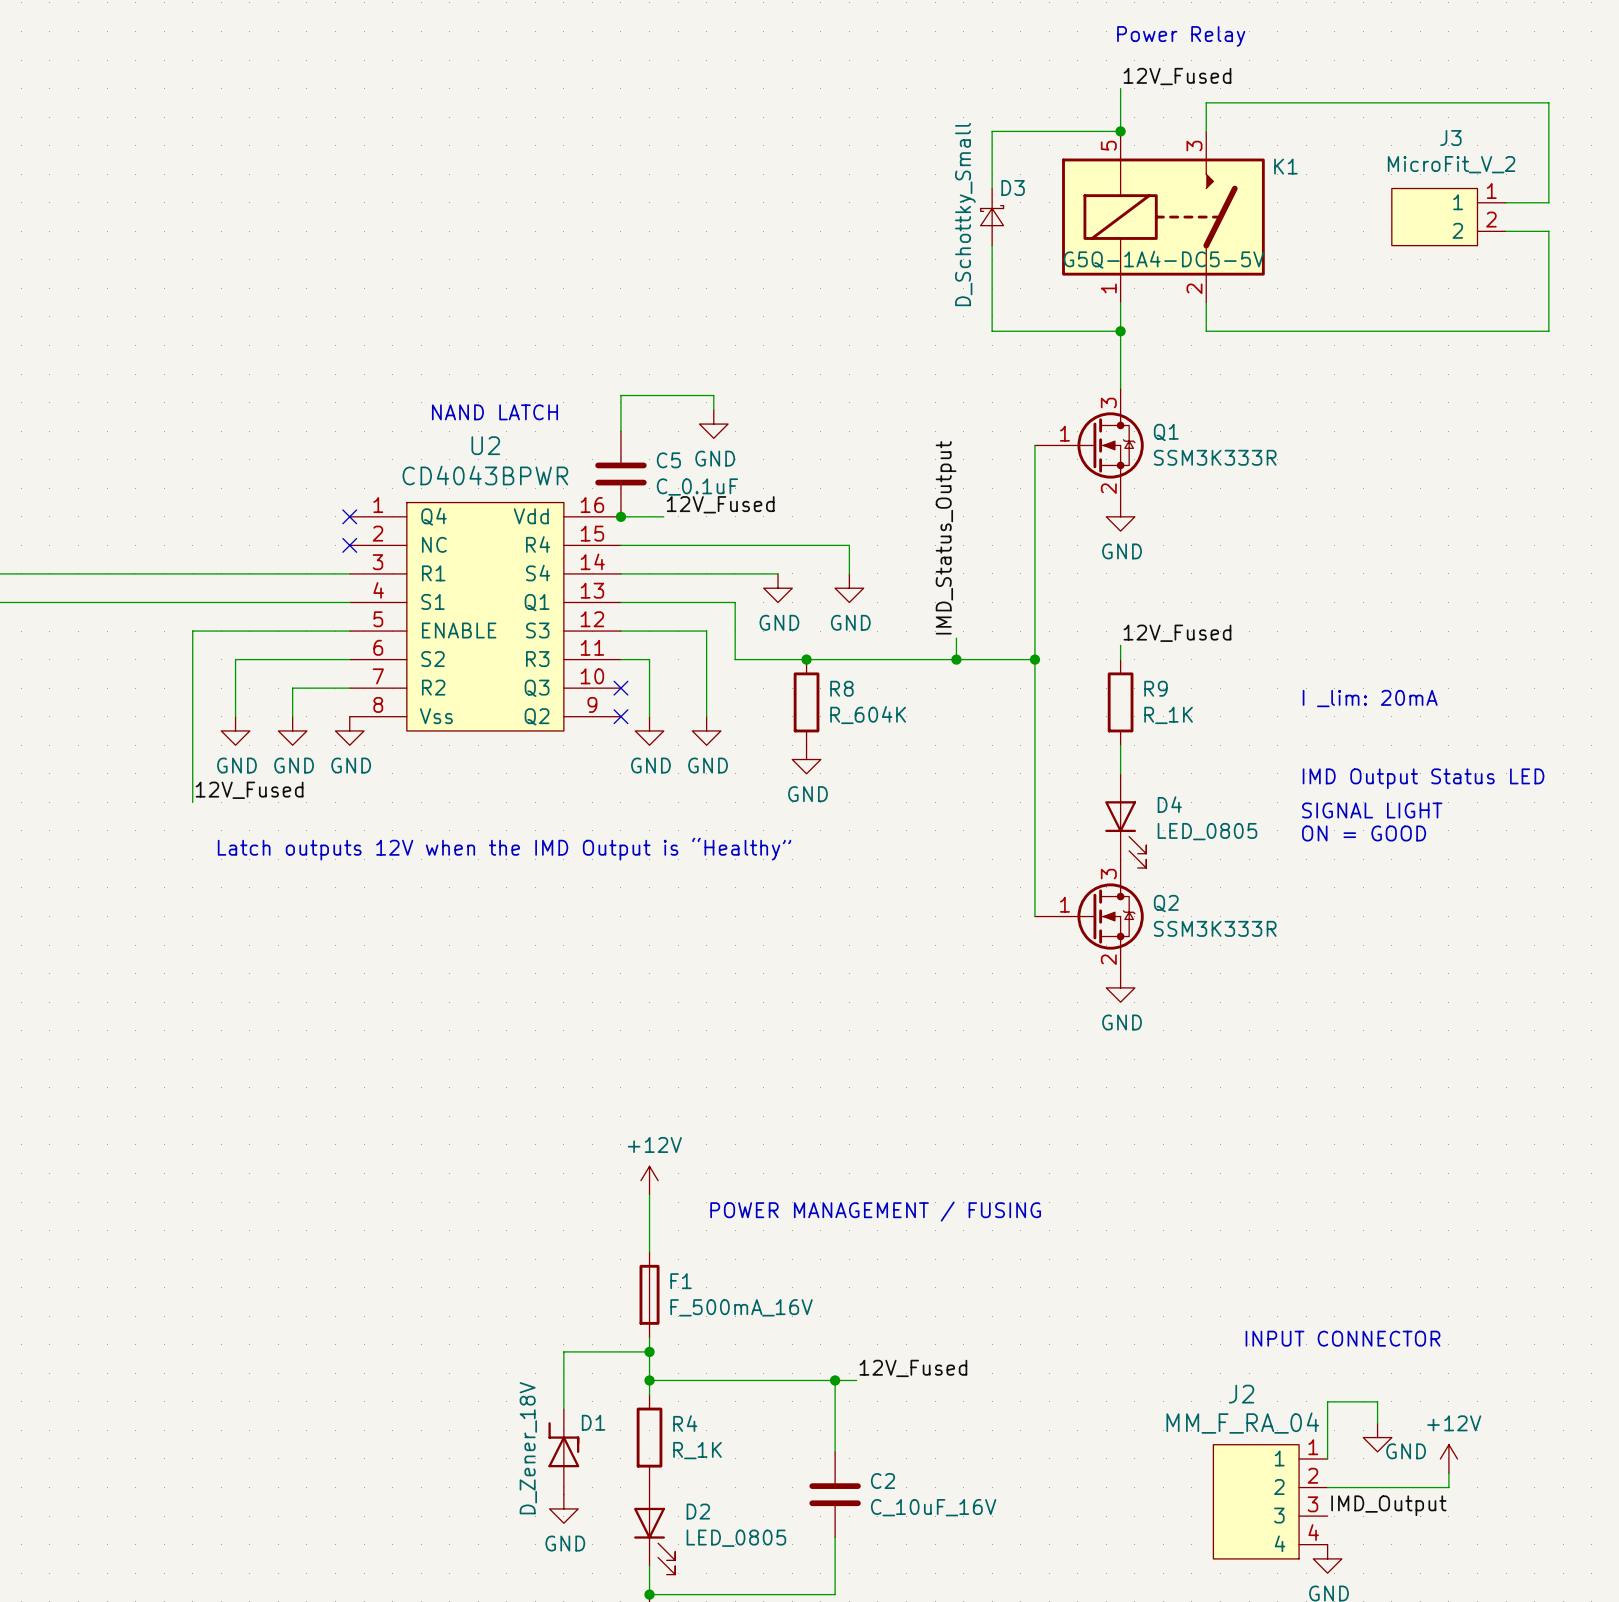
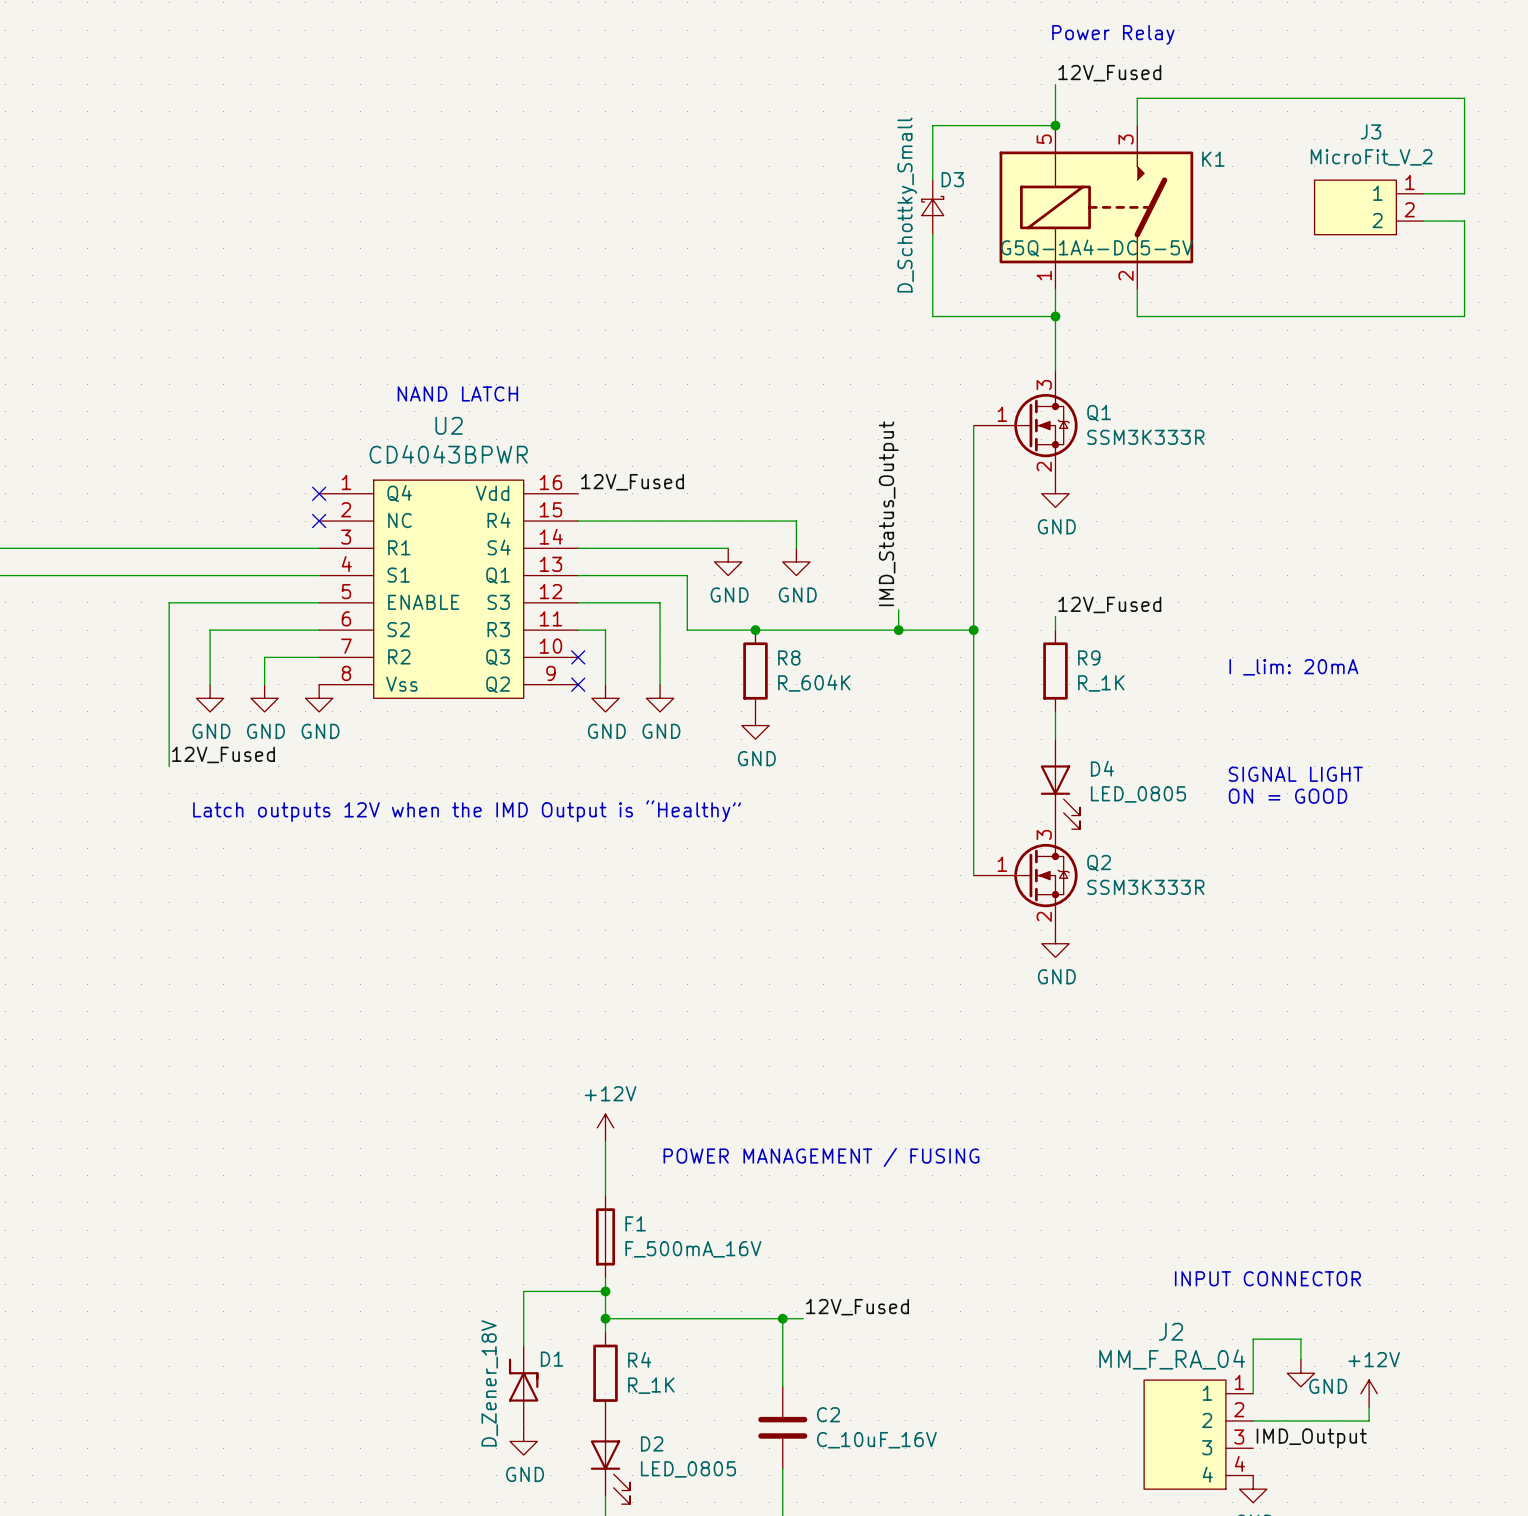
wire: (713, 409) (713, 395) (620, 395) (620, 431) -> none
power symbol: GND (713, 424) -> none
C5: C_0.1uF (620, 474) -> none
label position: 12V_Fused (720, 504) -> 12V_Fused (632, 482)
wire: (620, 516) (663, 516) -> none
junction: (620, 516) -> none
text: IMD Output Status LED (1423, 778) -> none

